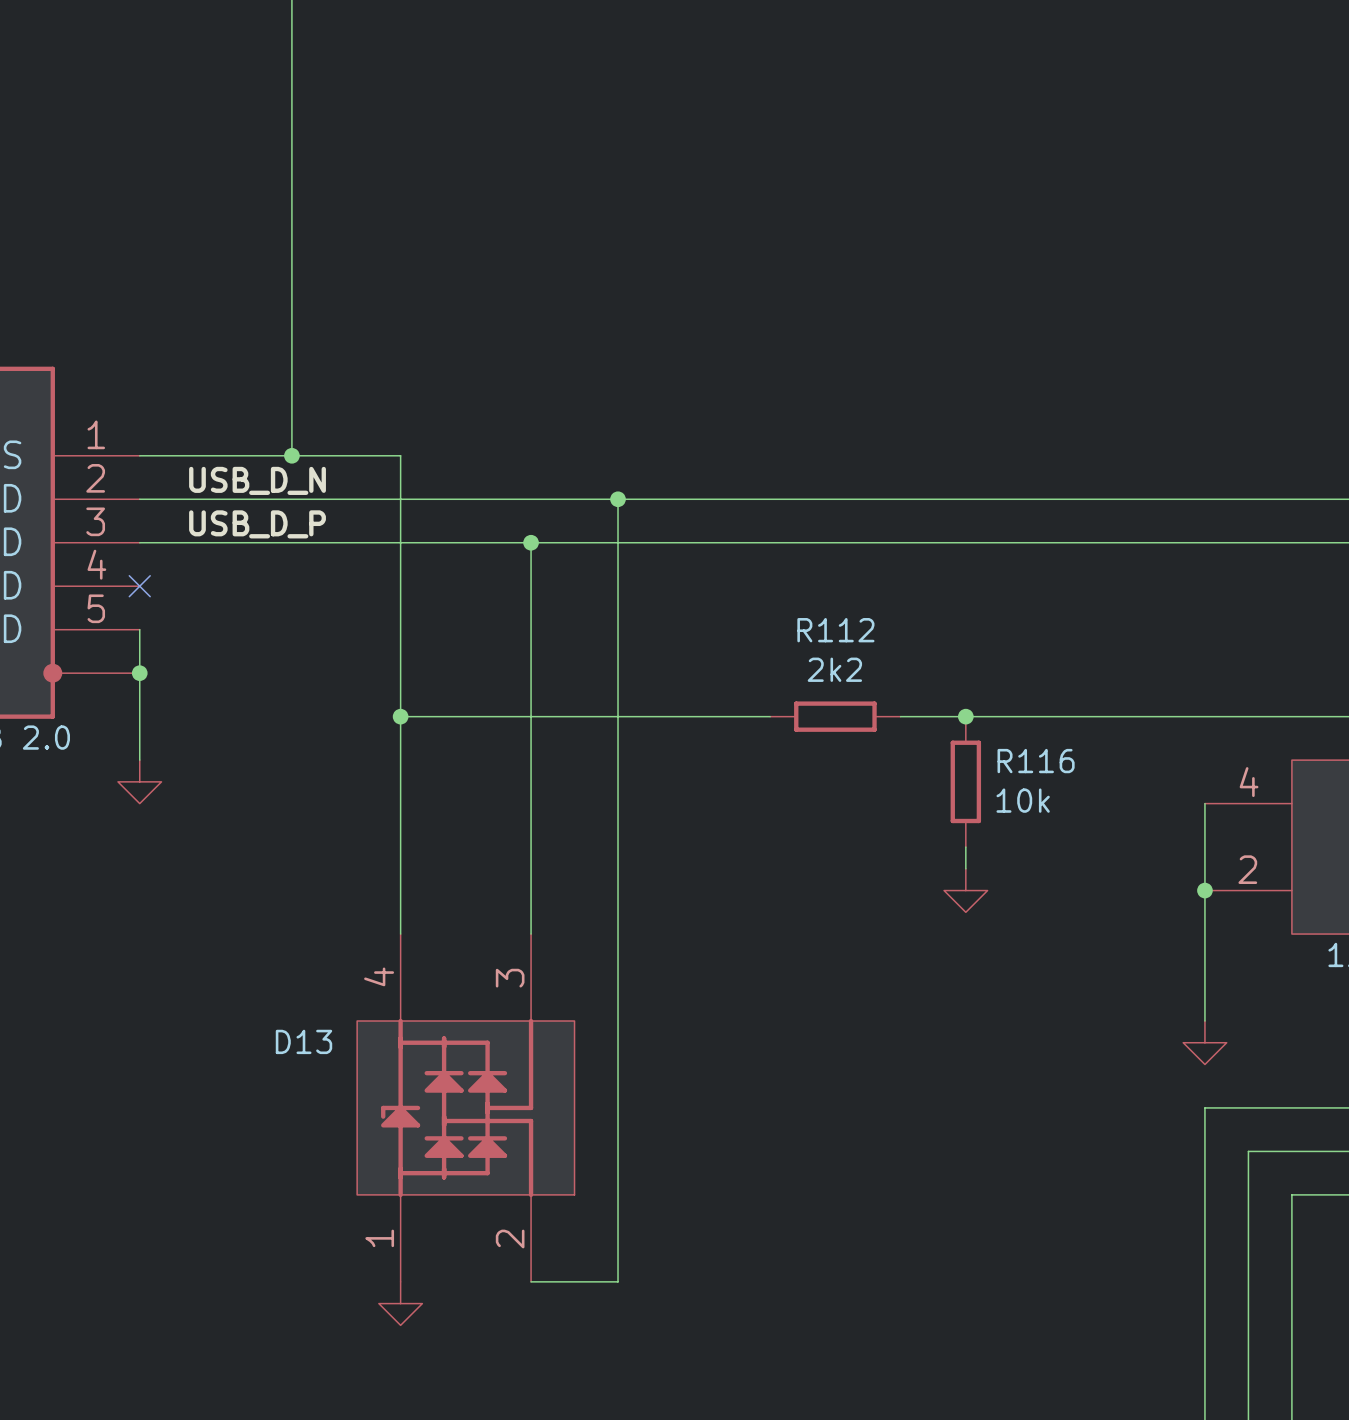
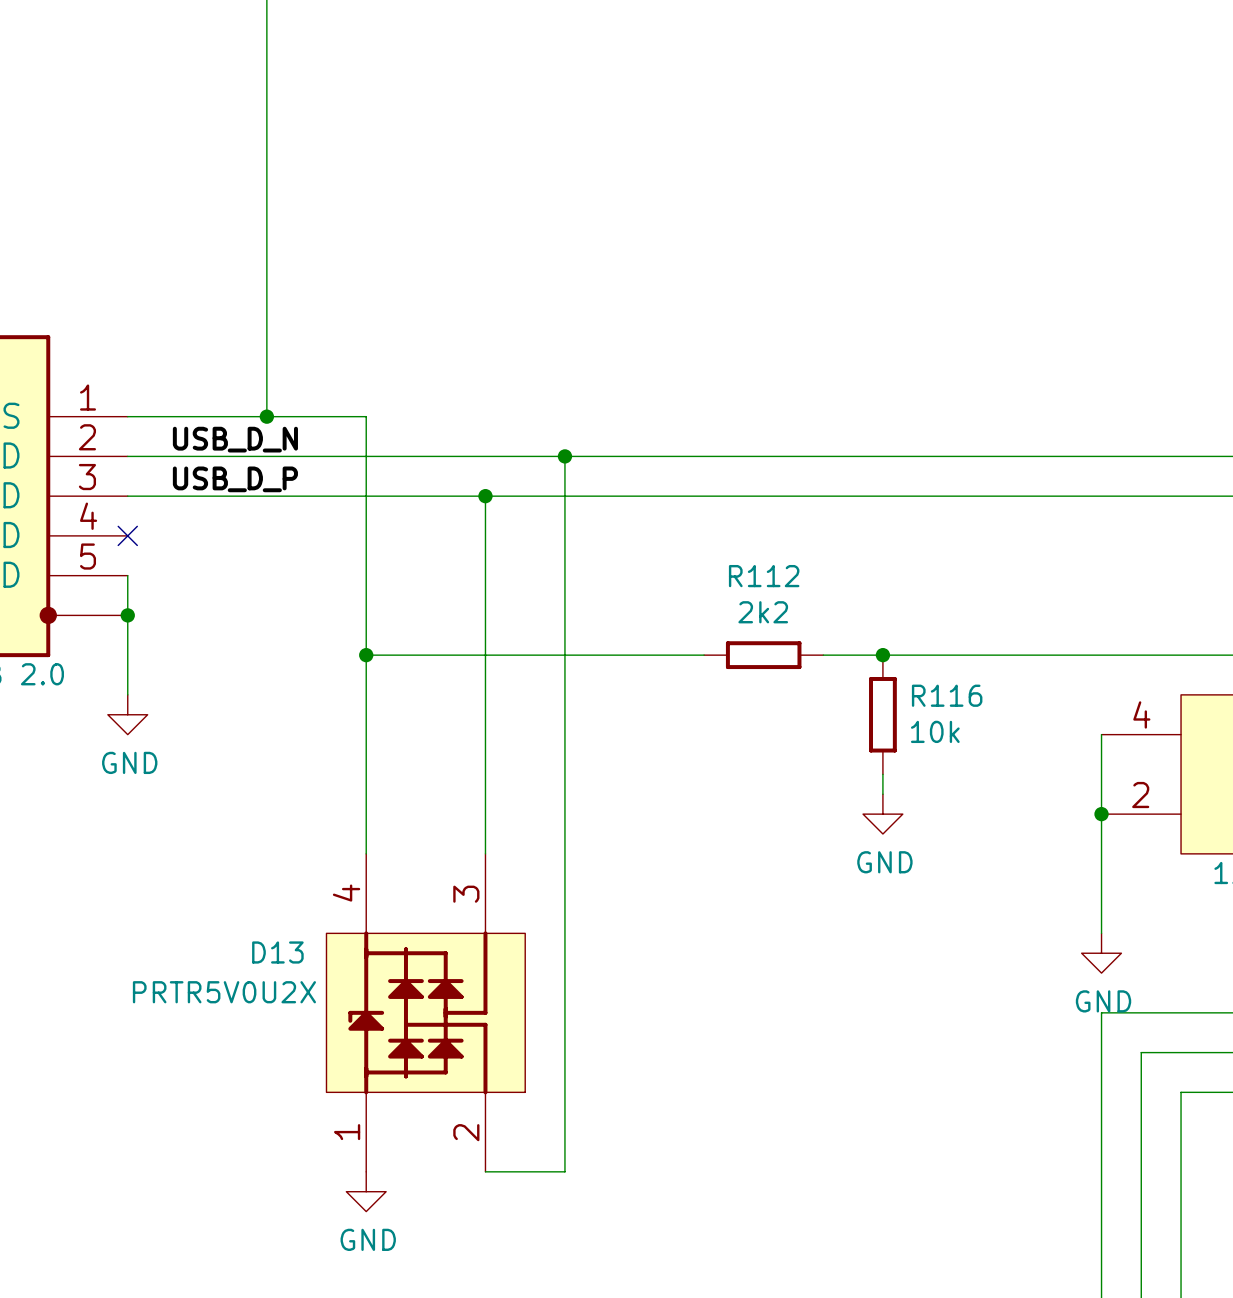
power symbol text: none -> GND (129, 762)
power symbol text: none -> GND (884, 862)
D13 value: none -> PRTR5V0U2X (224, 992)
power symbol text: none -> GND (1103, 1001)
power symbol text: none -> GND (368, 1239)

